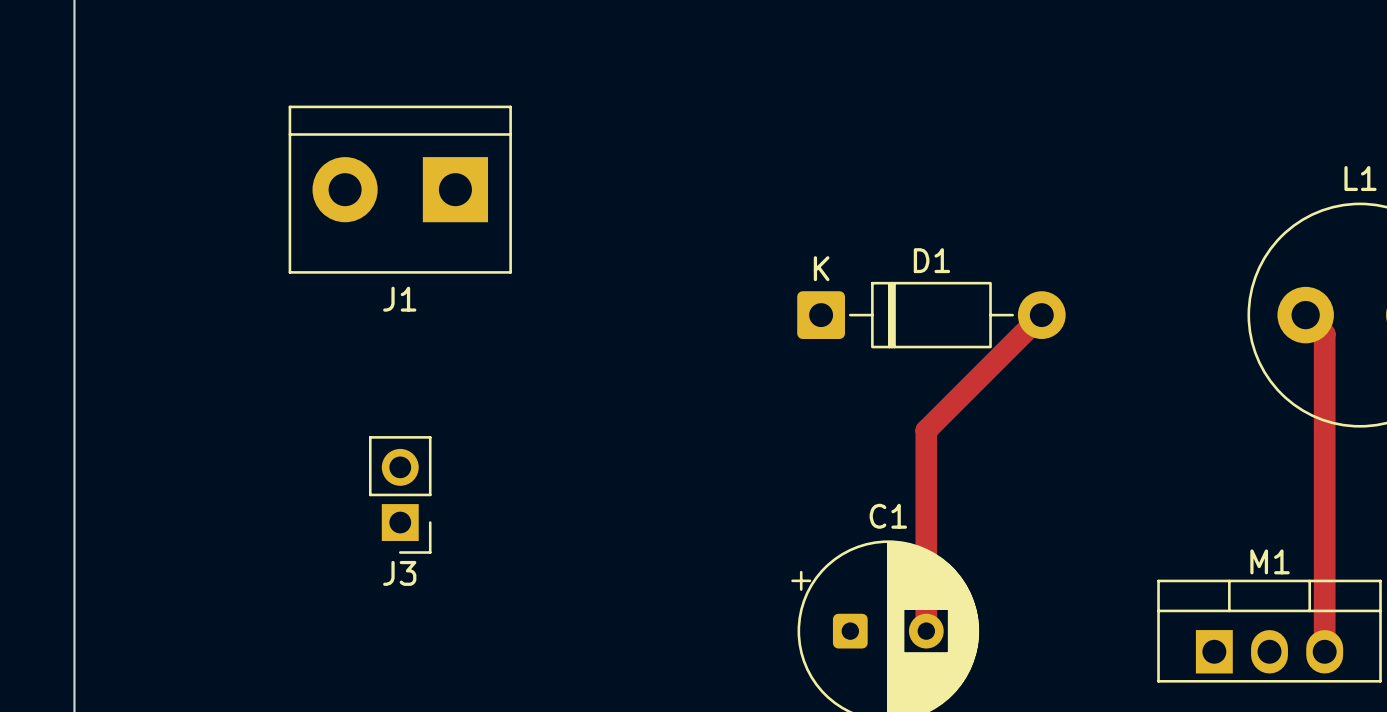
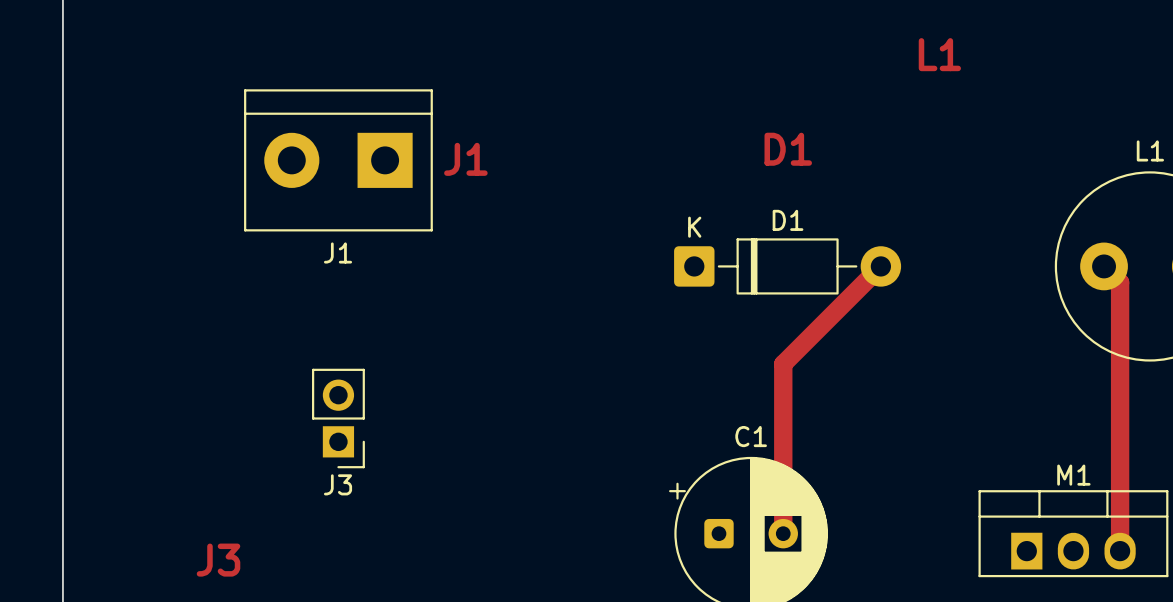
text: none -> L1 (939, 54)
text: none -> D1 (788, 149)
text: none -> J1 (465, 159)
text: none -> J3 (218, 560)

